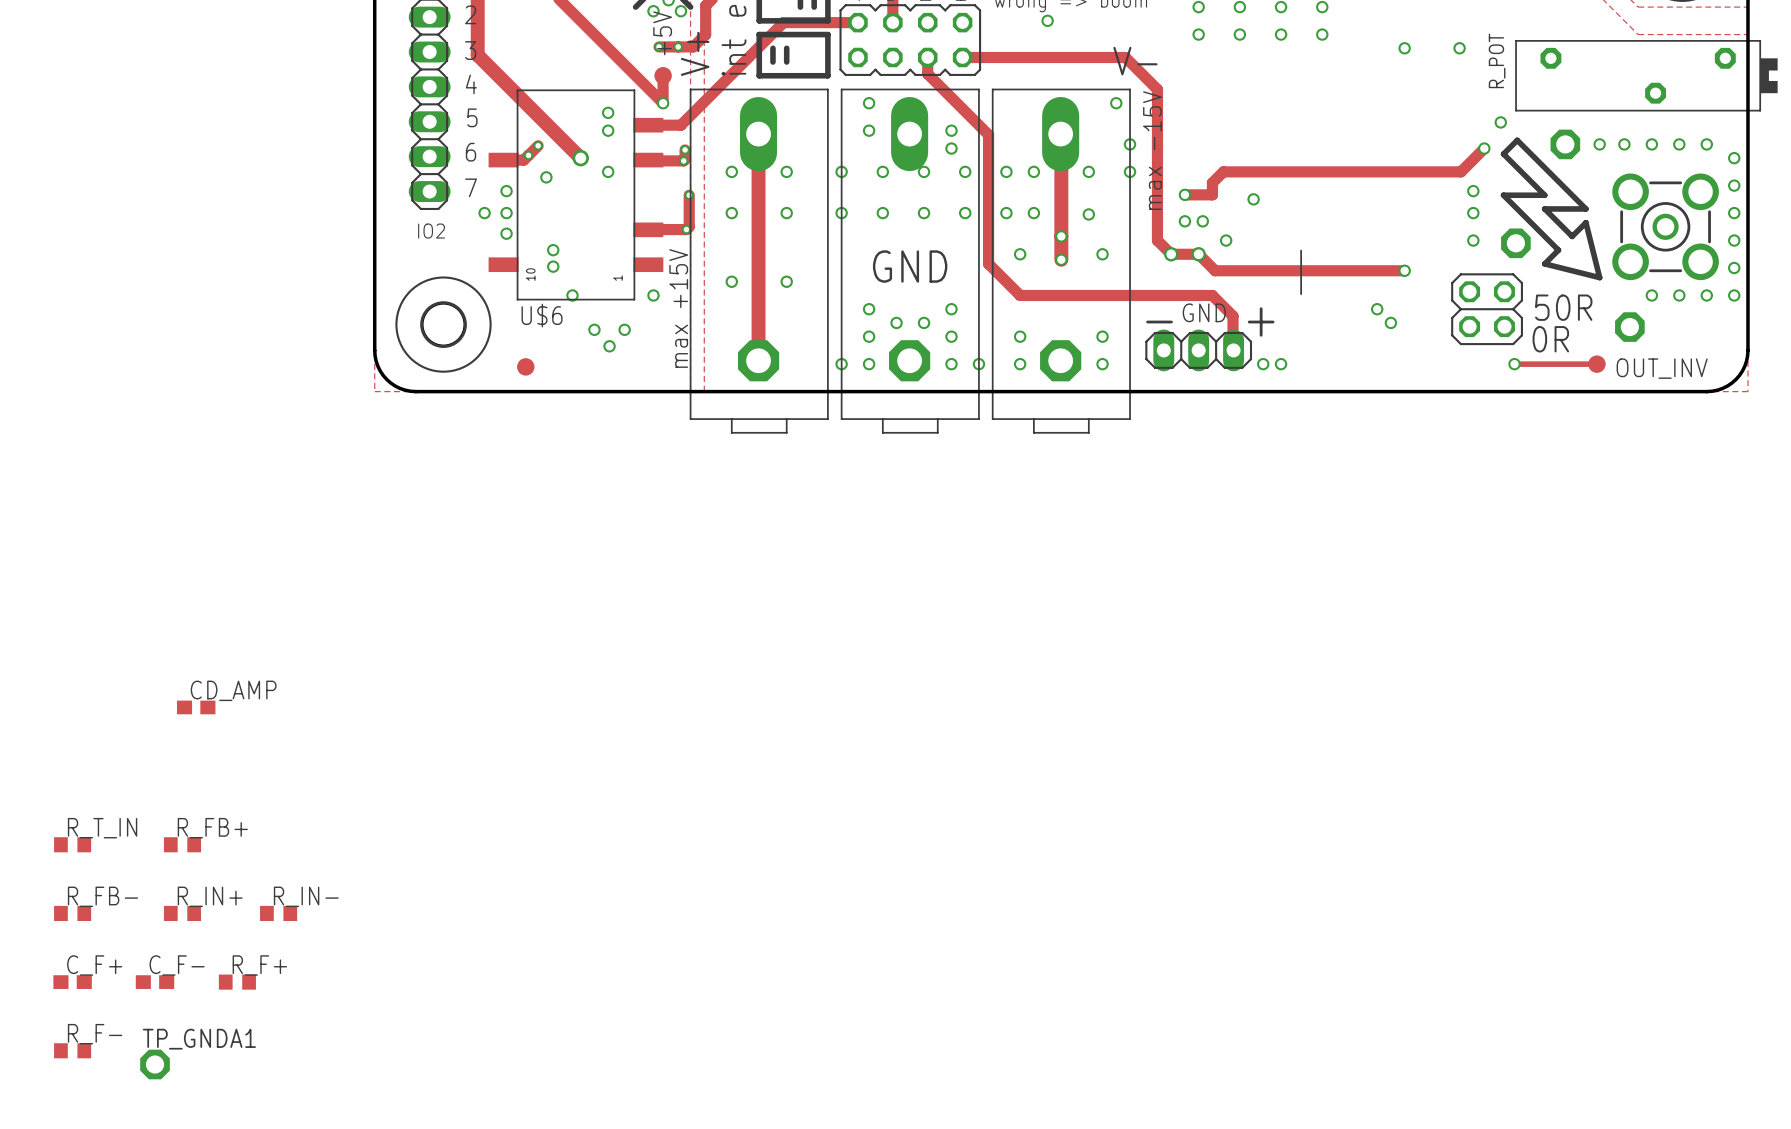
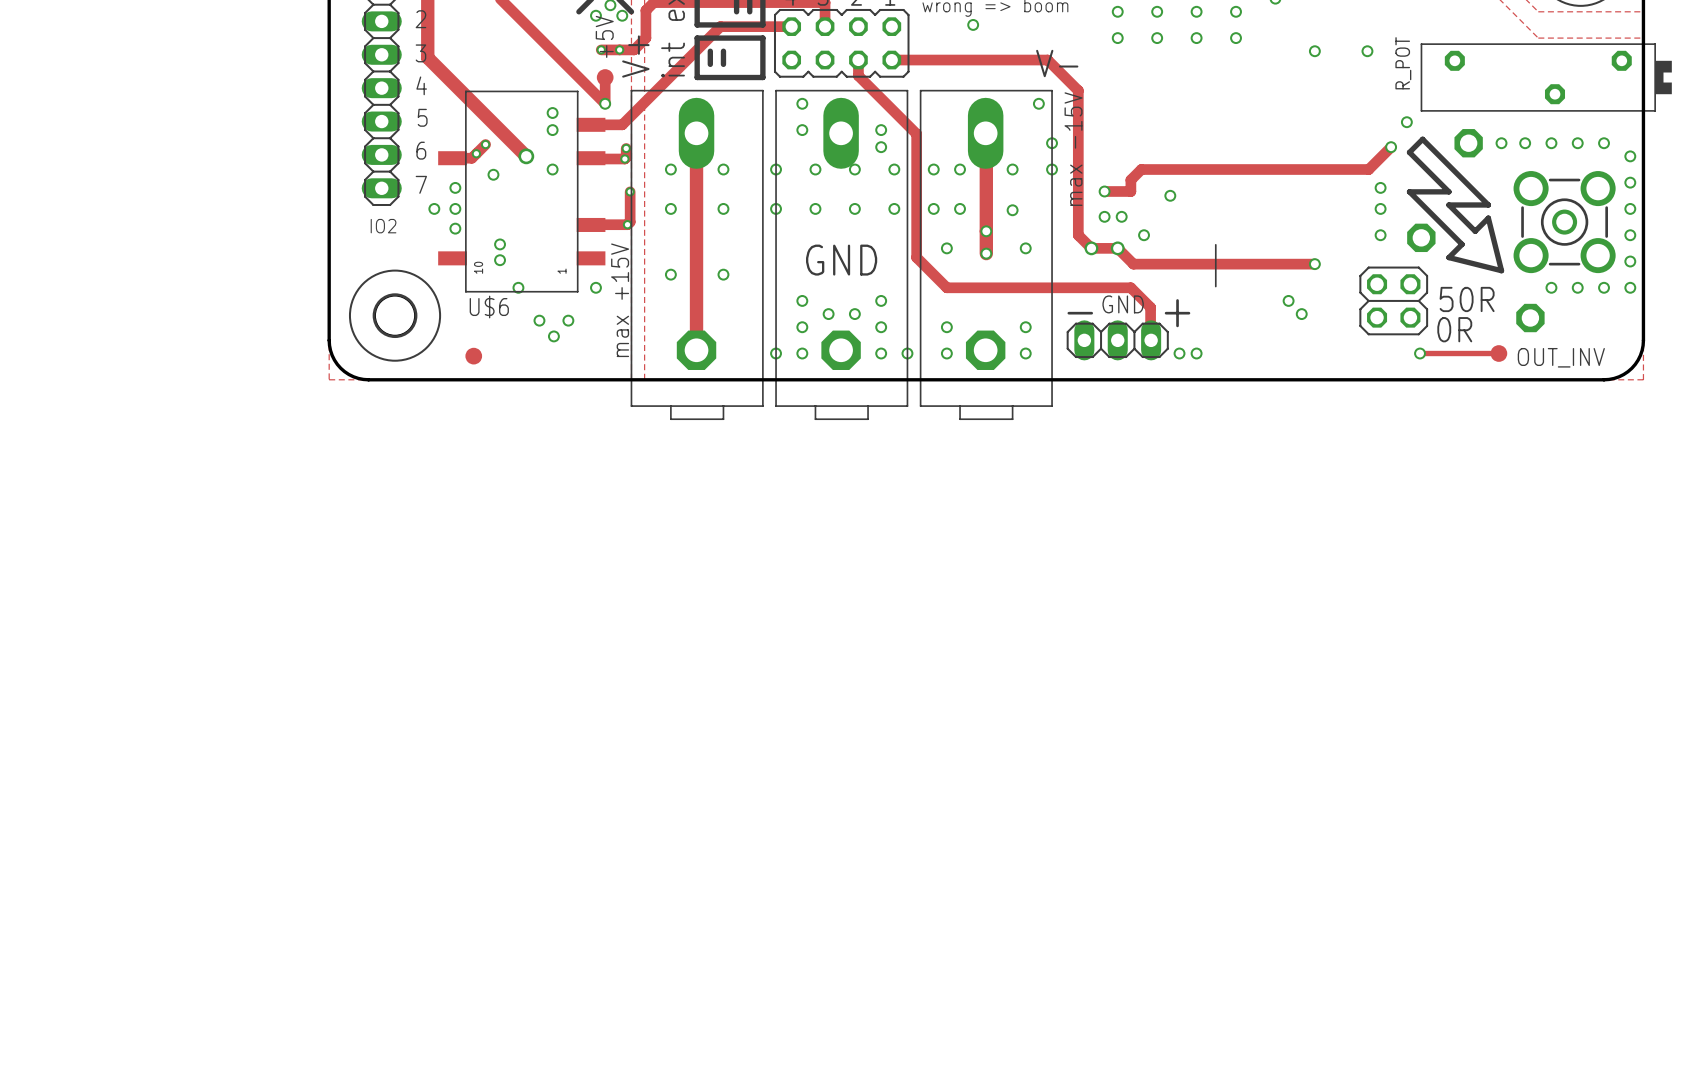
CD_AMP: (196, 707) -> none
R_T_IN: (72, 844) -> none
R_FB+: (182, 844) -> none
R_FB-: (72, 913) -> none
R_IN+: (182, 913) -> none
R_IN-: (278, 913) -> none
C_F+: (72, 982) -> none
C_F-: (155, 982) -> none
R_F+: (237, 982) -> none
R_F-: (72, 1050) -> none
TP_GNDA1: (155, 1064) -> none

